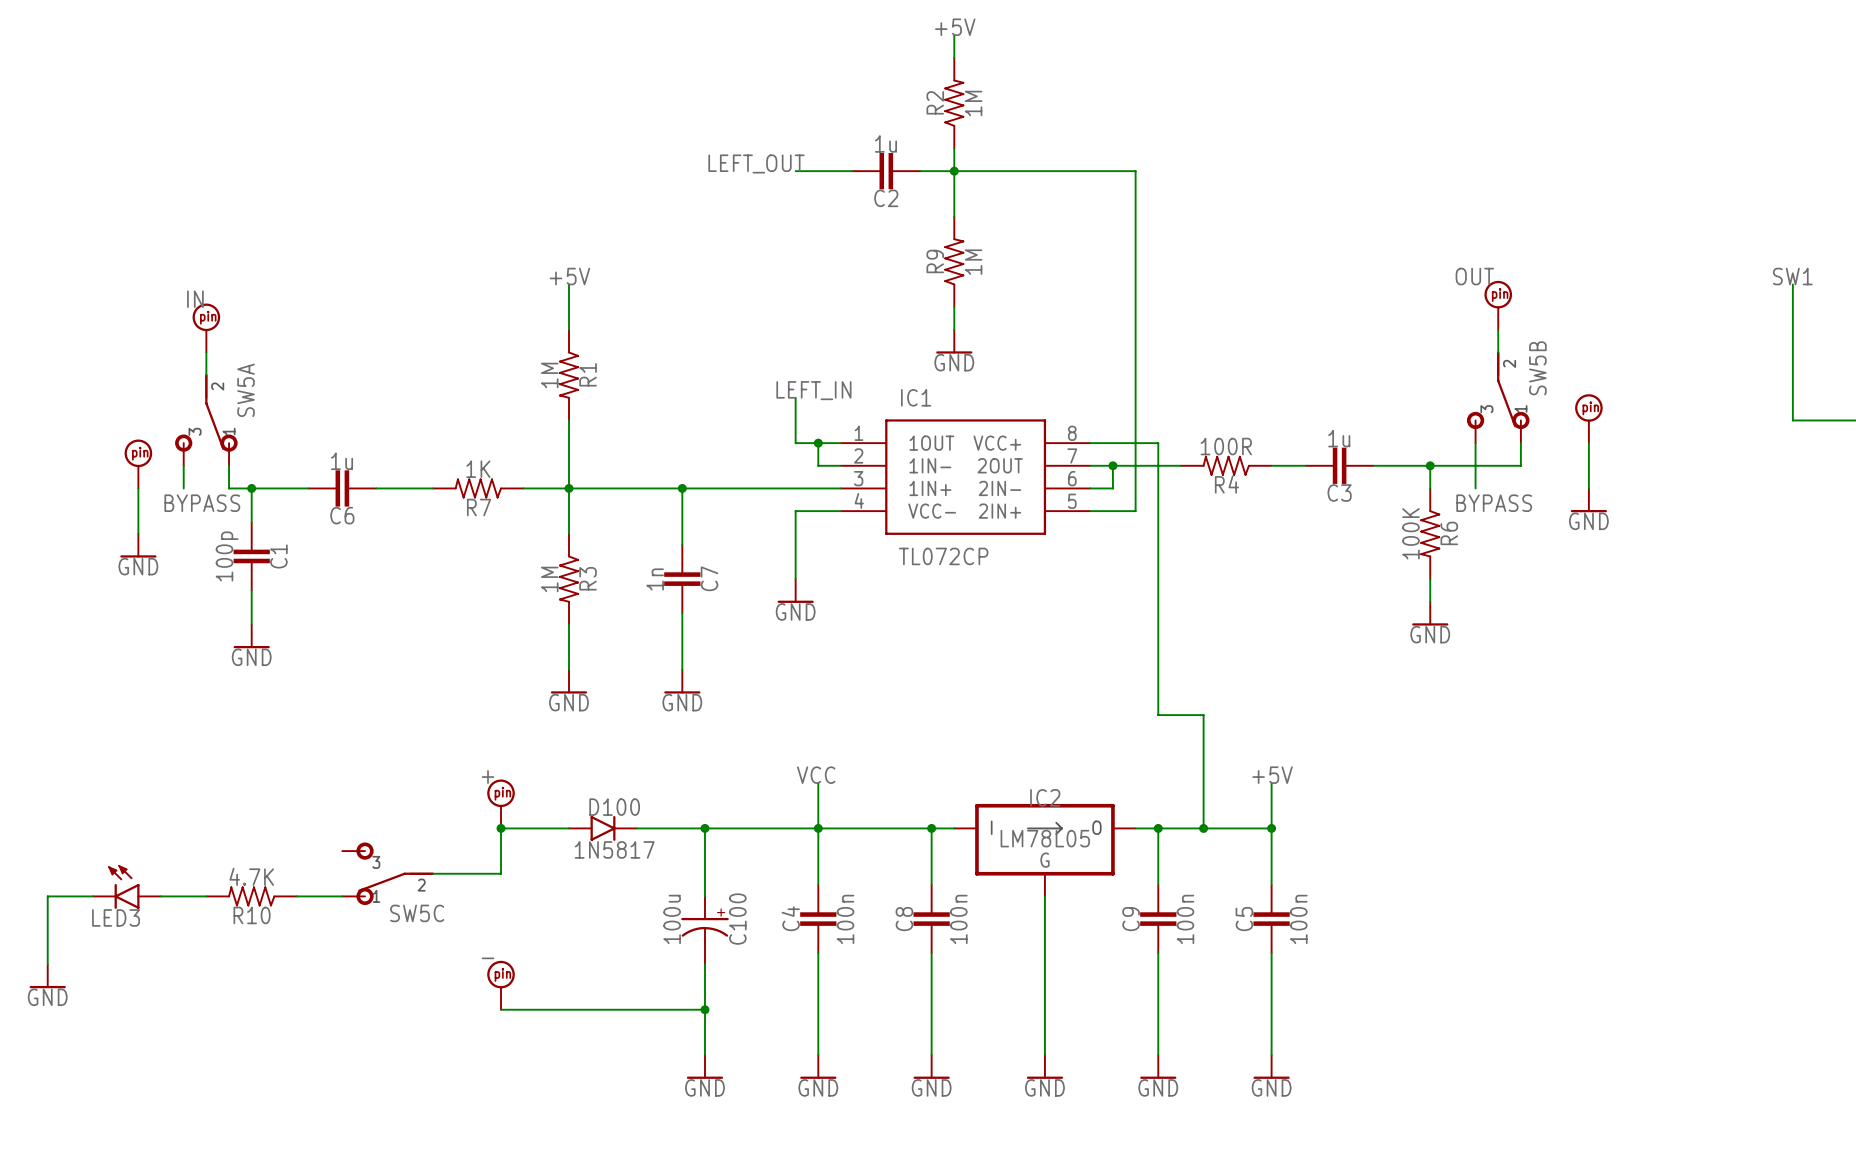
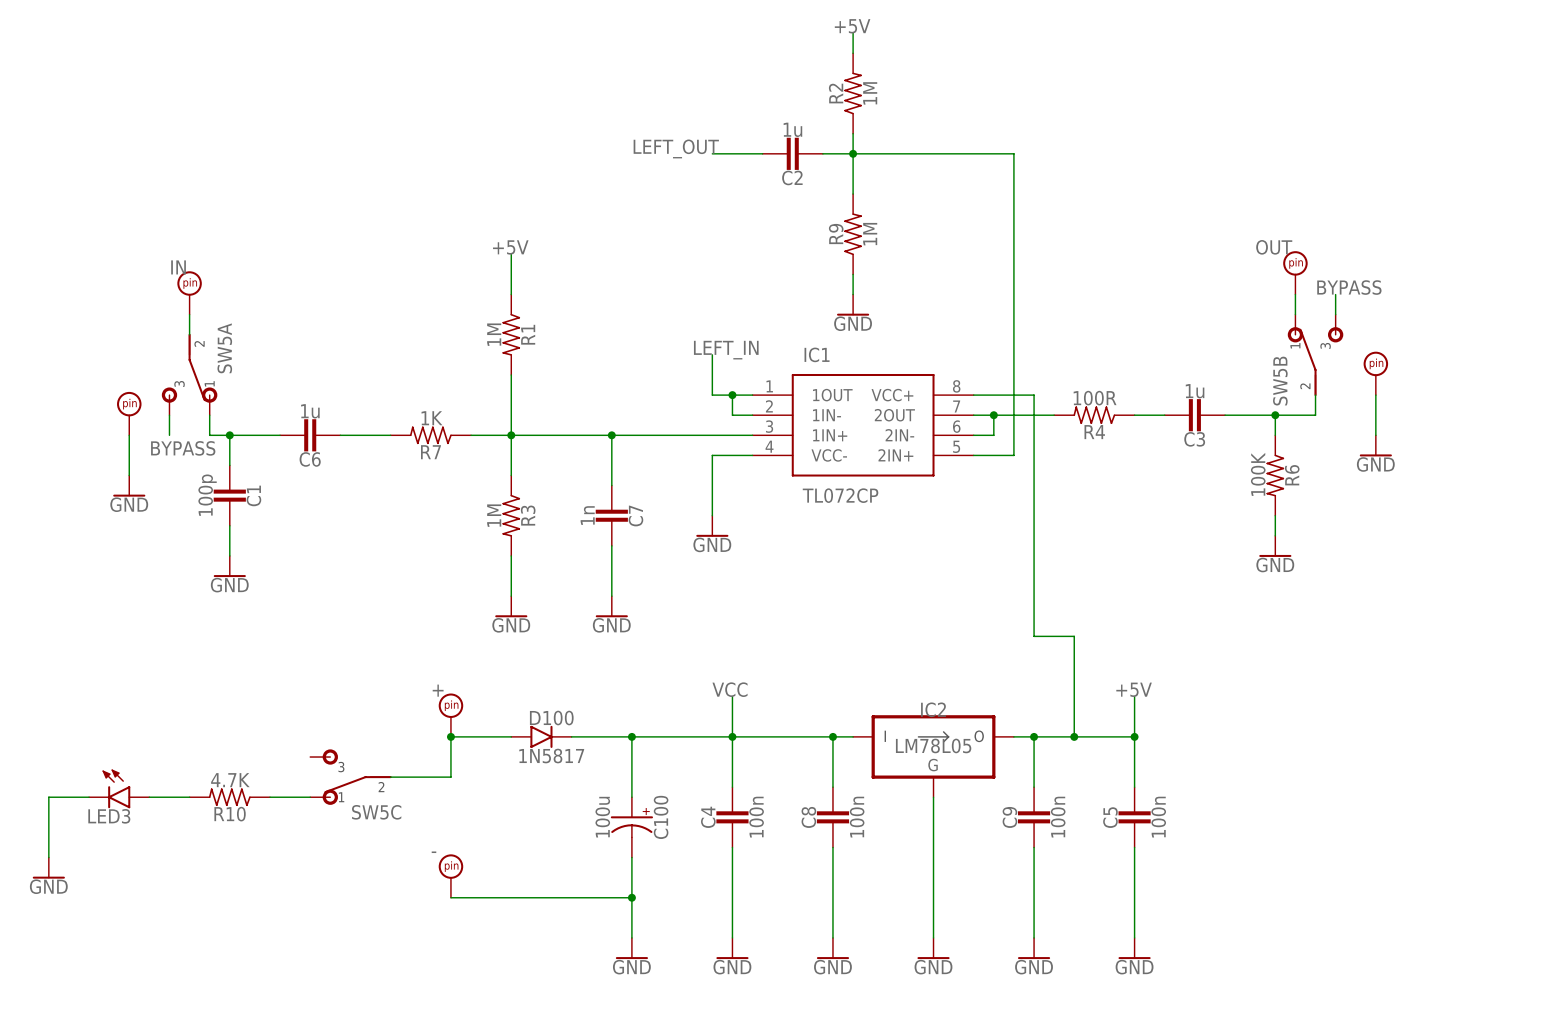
part position: (1498, 305) -> (1295, 272)
wire: none -> (1295, 294) (1295, 314)
SW5B symbol: [1466, 351, 1530, 444] -> [1287, 314, 1344, 397]
SW5B name position: SW5B (1537, 368) -> SW5B (1280, 381)
part position: (1588, 418) -> (1375, 373)
wire: (1520, 443) (1520, 465) (1475, 465) (1475, 488) -> none
wire: (1588, 443) (1588, 488) -> (1375, 395) (1375, 435)
power symbol position: GND (1588, 500) -> GND (1375, 445)
label position: BYPASS (1494, 503) -> BYPASS (1349, 287)

